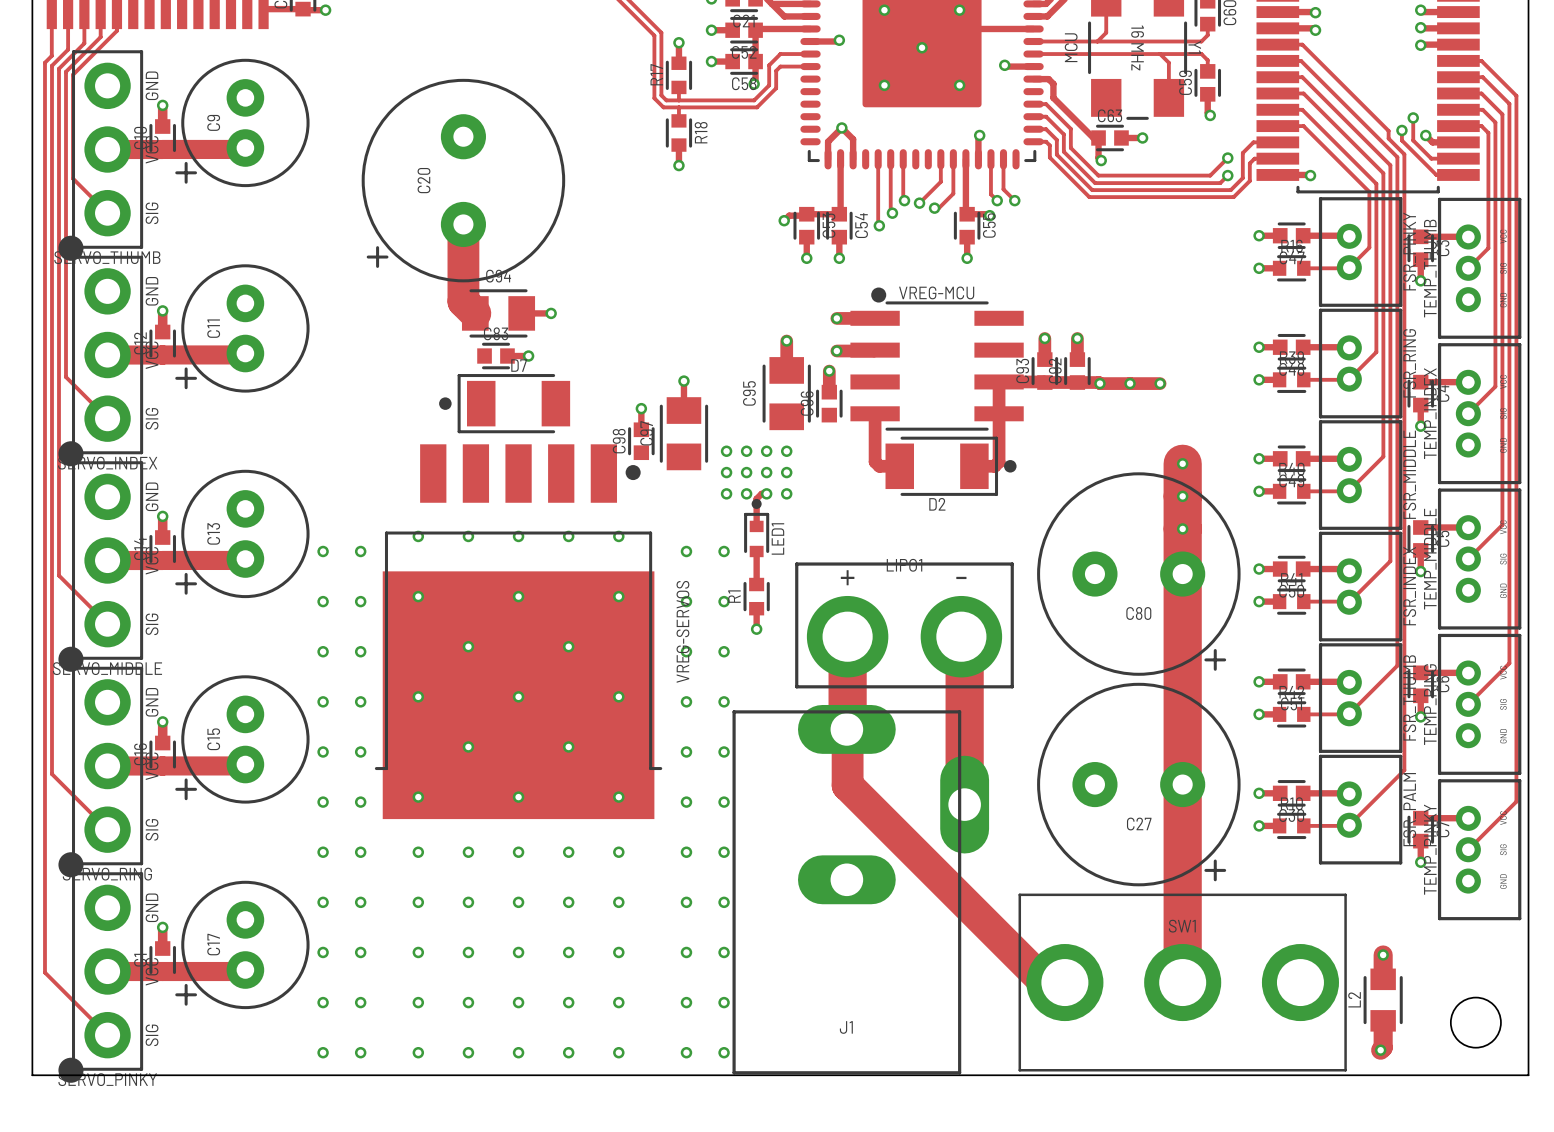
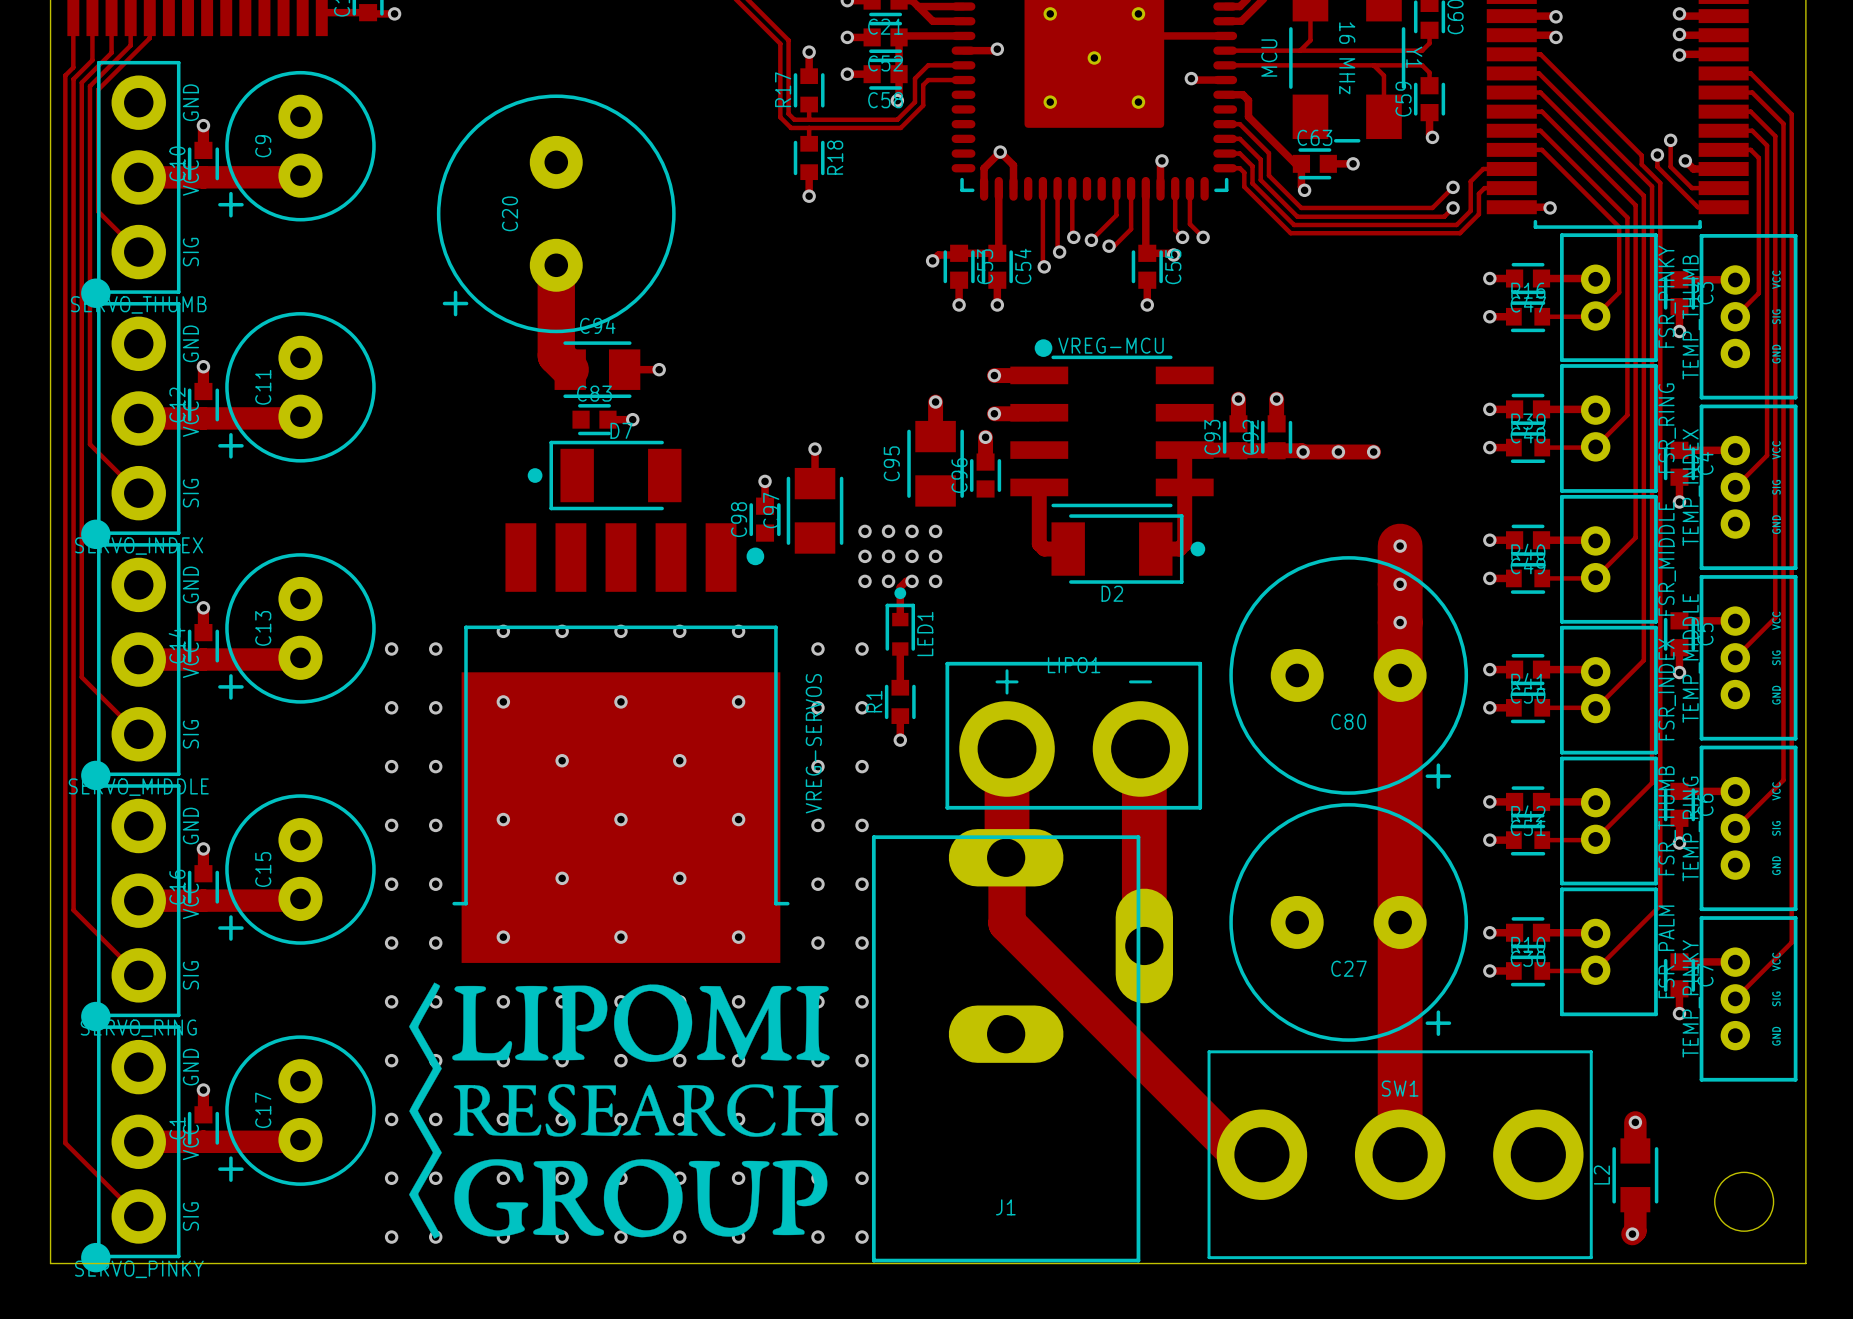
drawing: none -> [409, 982, 839, 1239]

